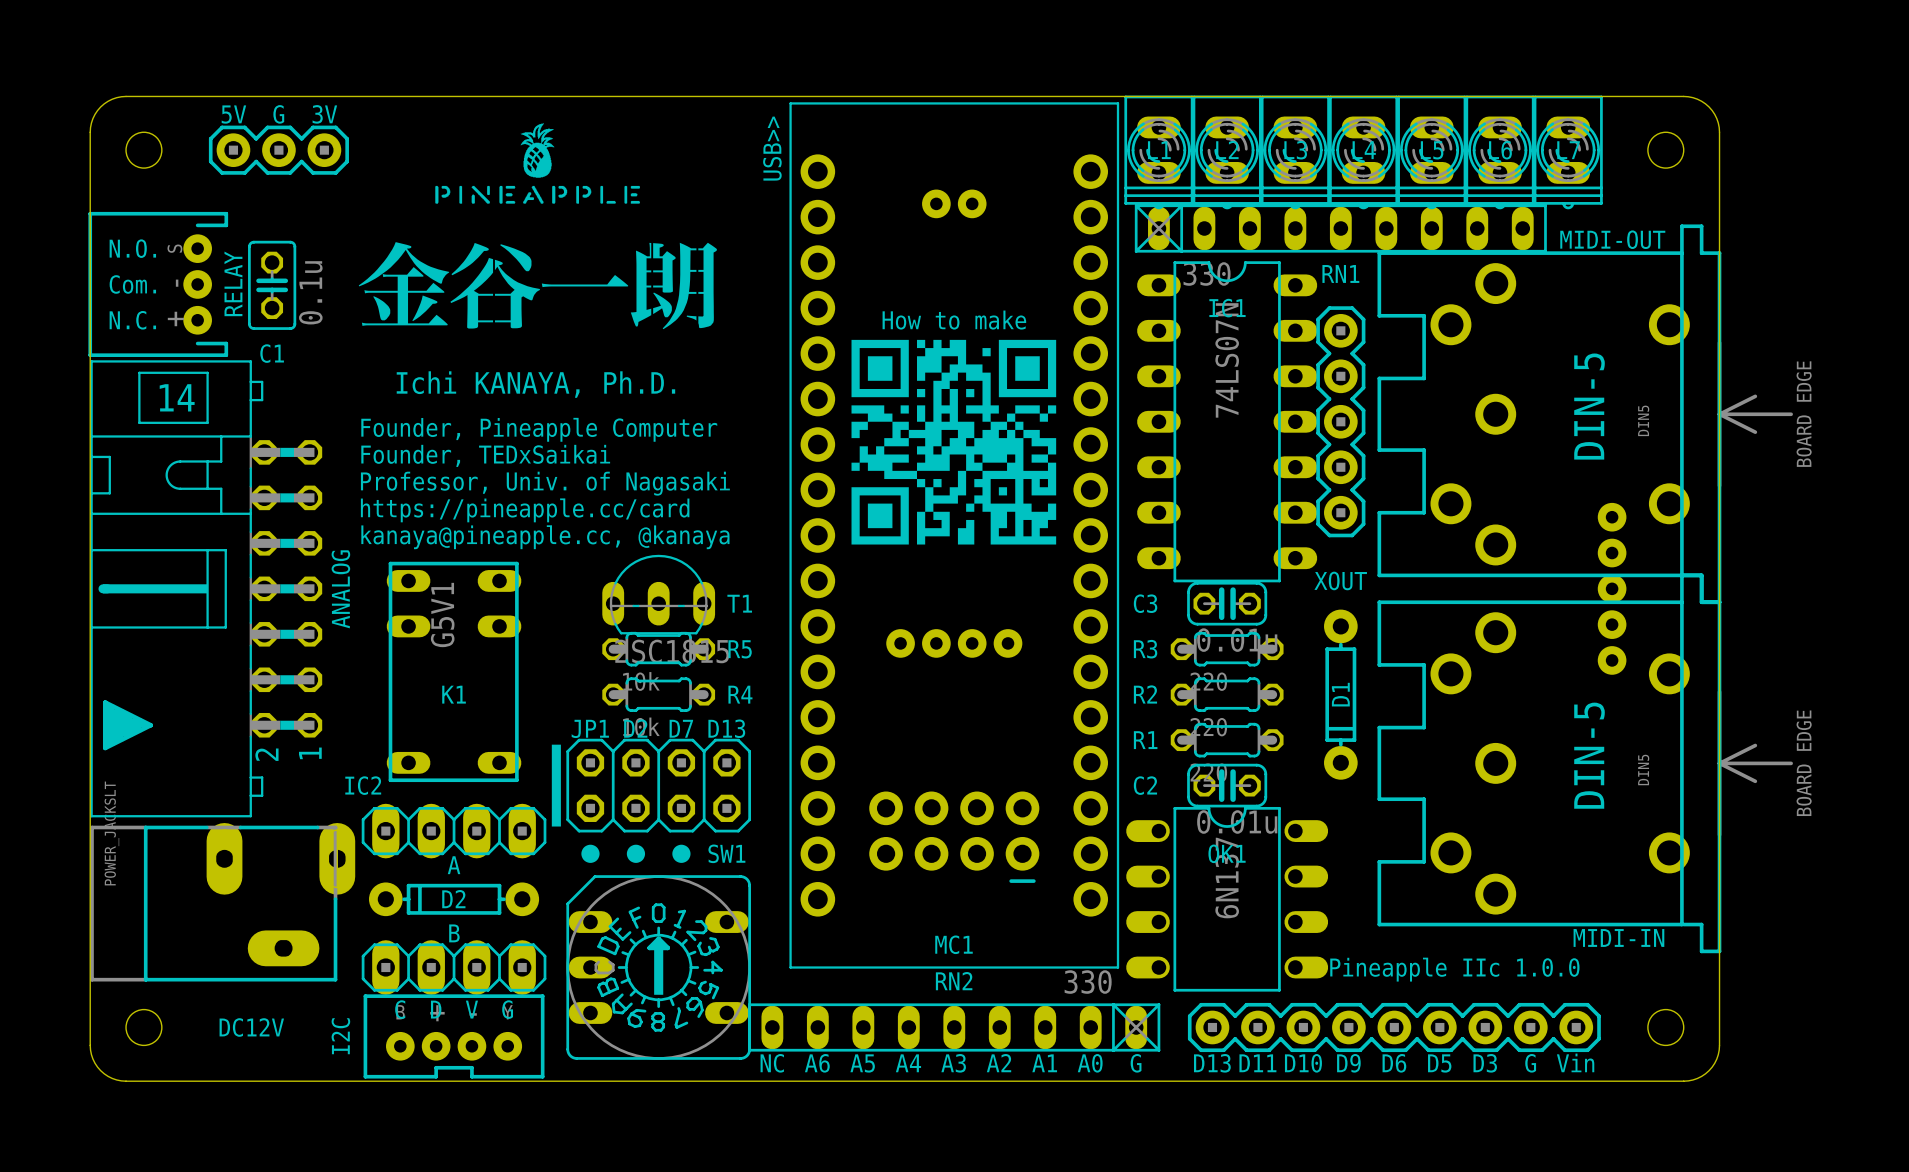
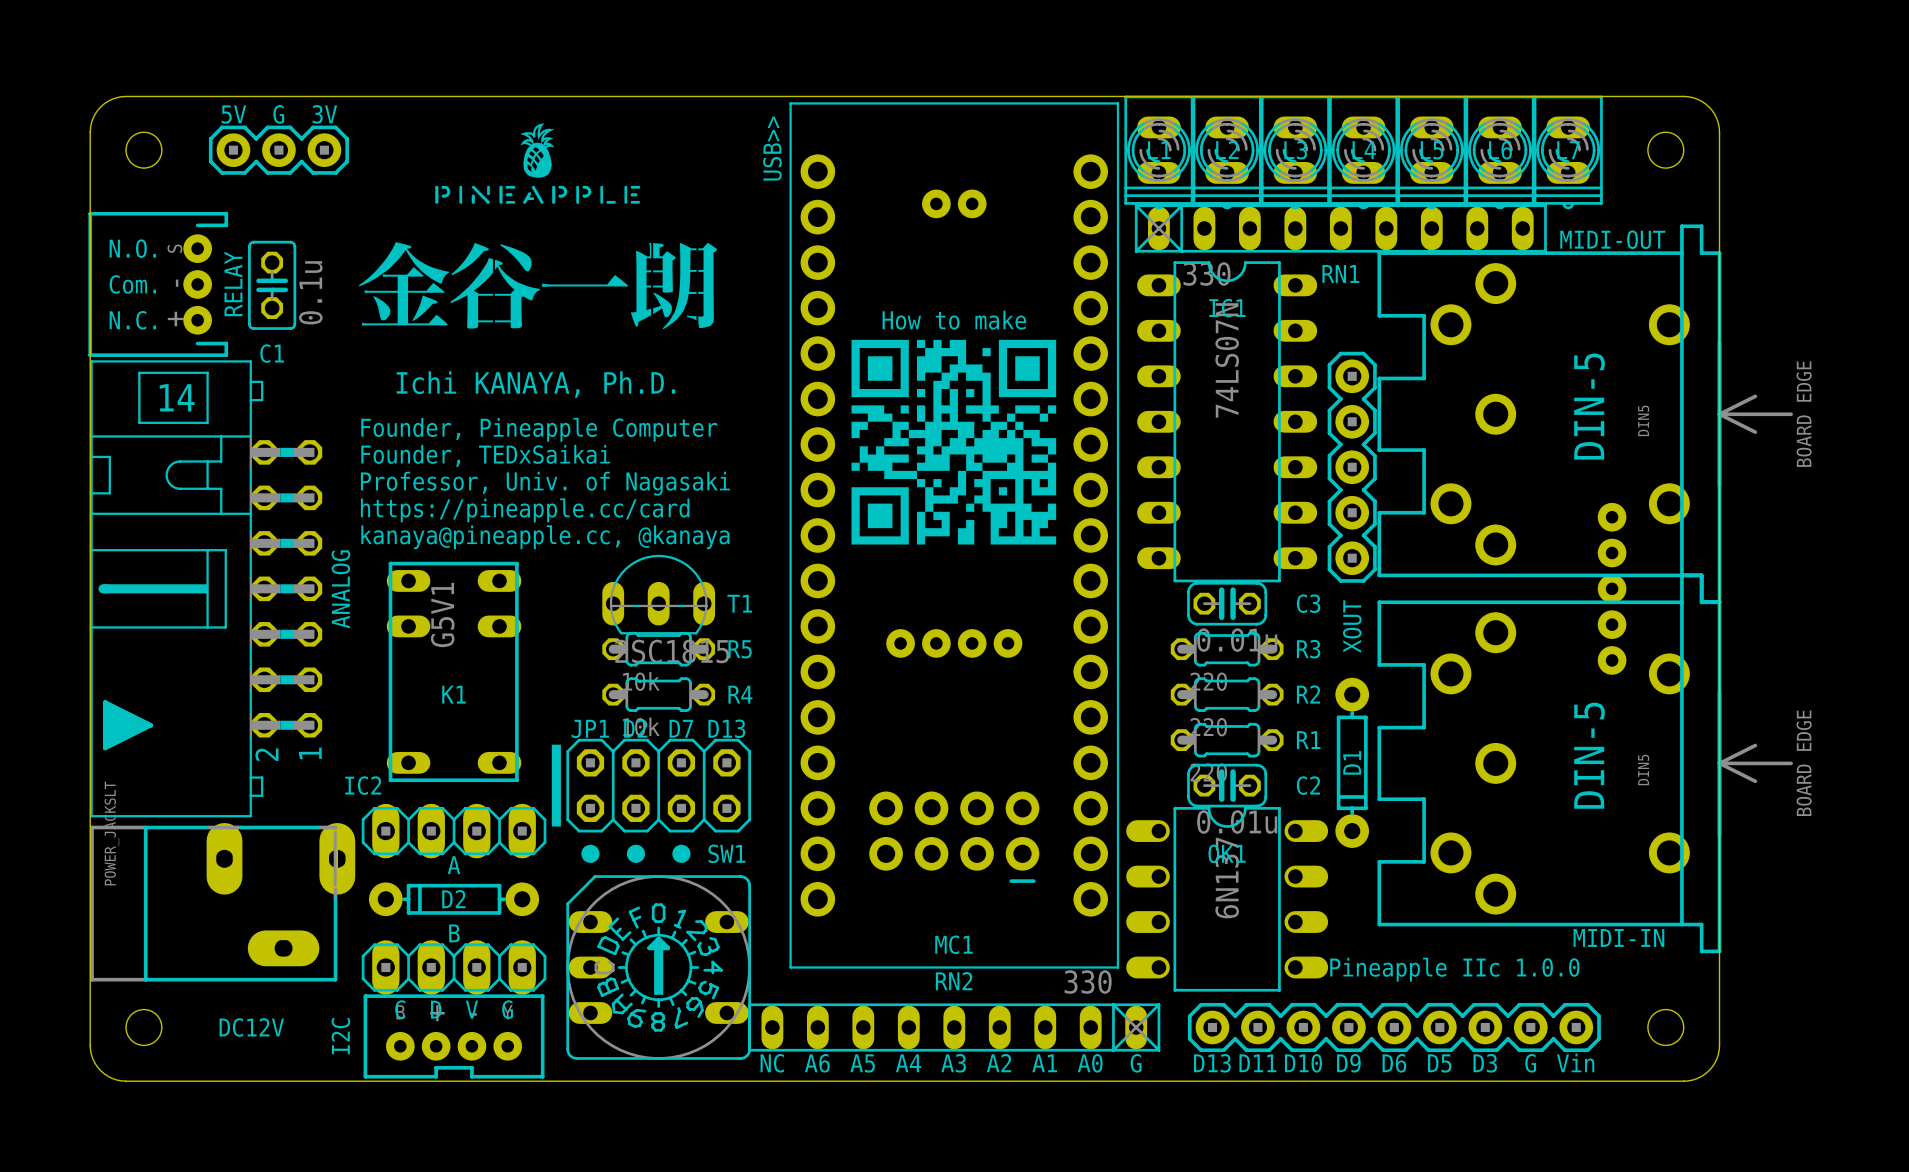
XOUT position: (1340, 421) -> (1352, 467)
XOUT name rotation: 0° (1340, 580) -> 90° counterclockwise (1352, 626)
C3 name position: C3 (1145, 603) -> C3 (1308, 603)
R3 name position: R3 (1145, 649) -> R3 (1308, 649)
R2 name position: R2 (1145, 694) -> R2 (1308, 694)
D1 position: (1340, 694) -> (1352, 762)
R1 name position: R1 (1145, 740) -> R1 (1308, 740)
C2 name position: C2 (1145, 785) -> C2 (1308, 785)

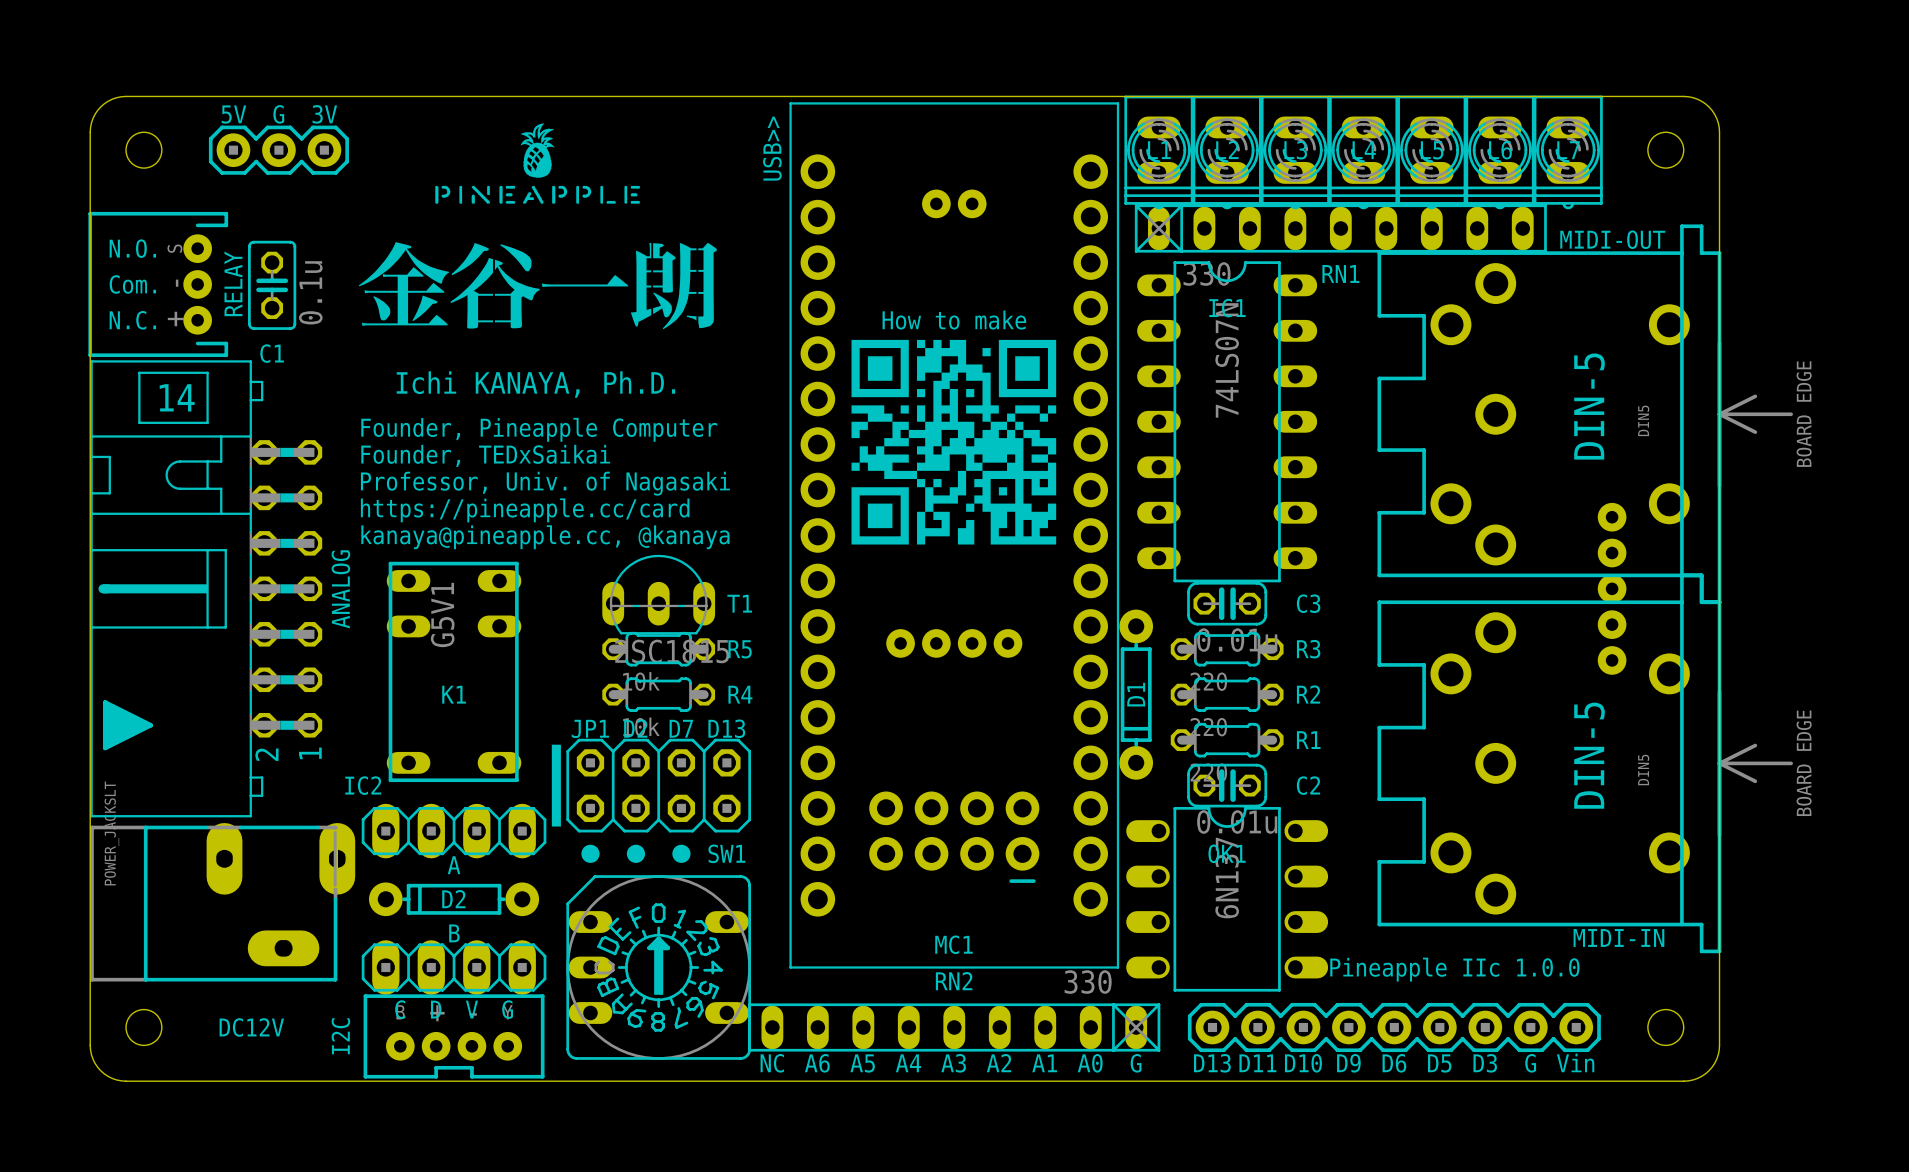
XOUT: (1352, 467) -> none
D1 position: (1352, 762) -> (1136, 694)

